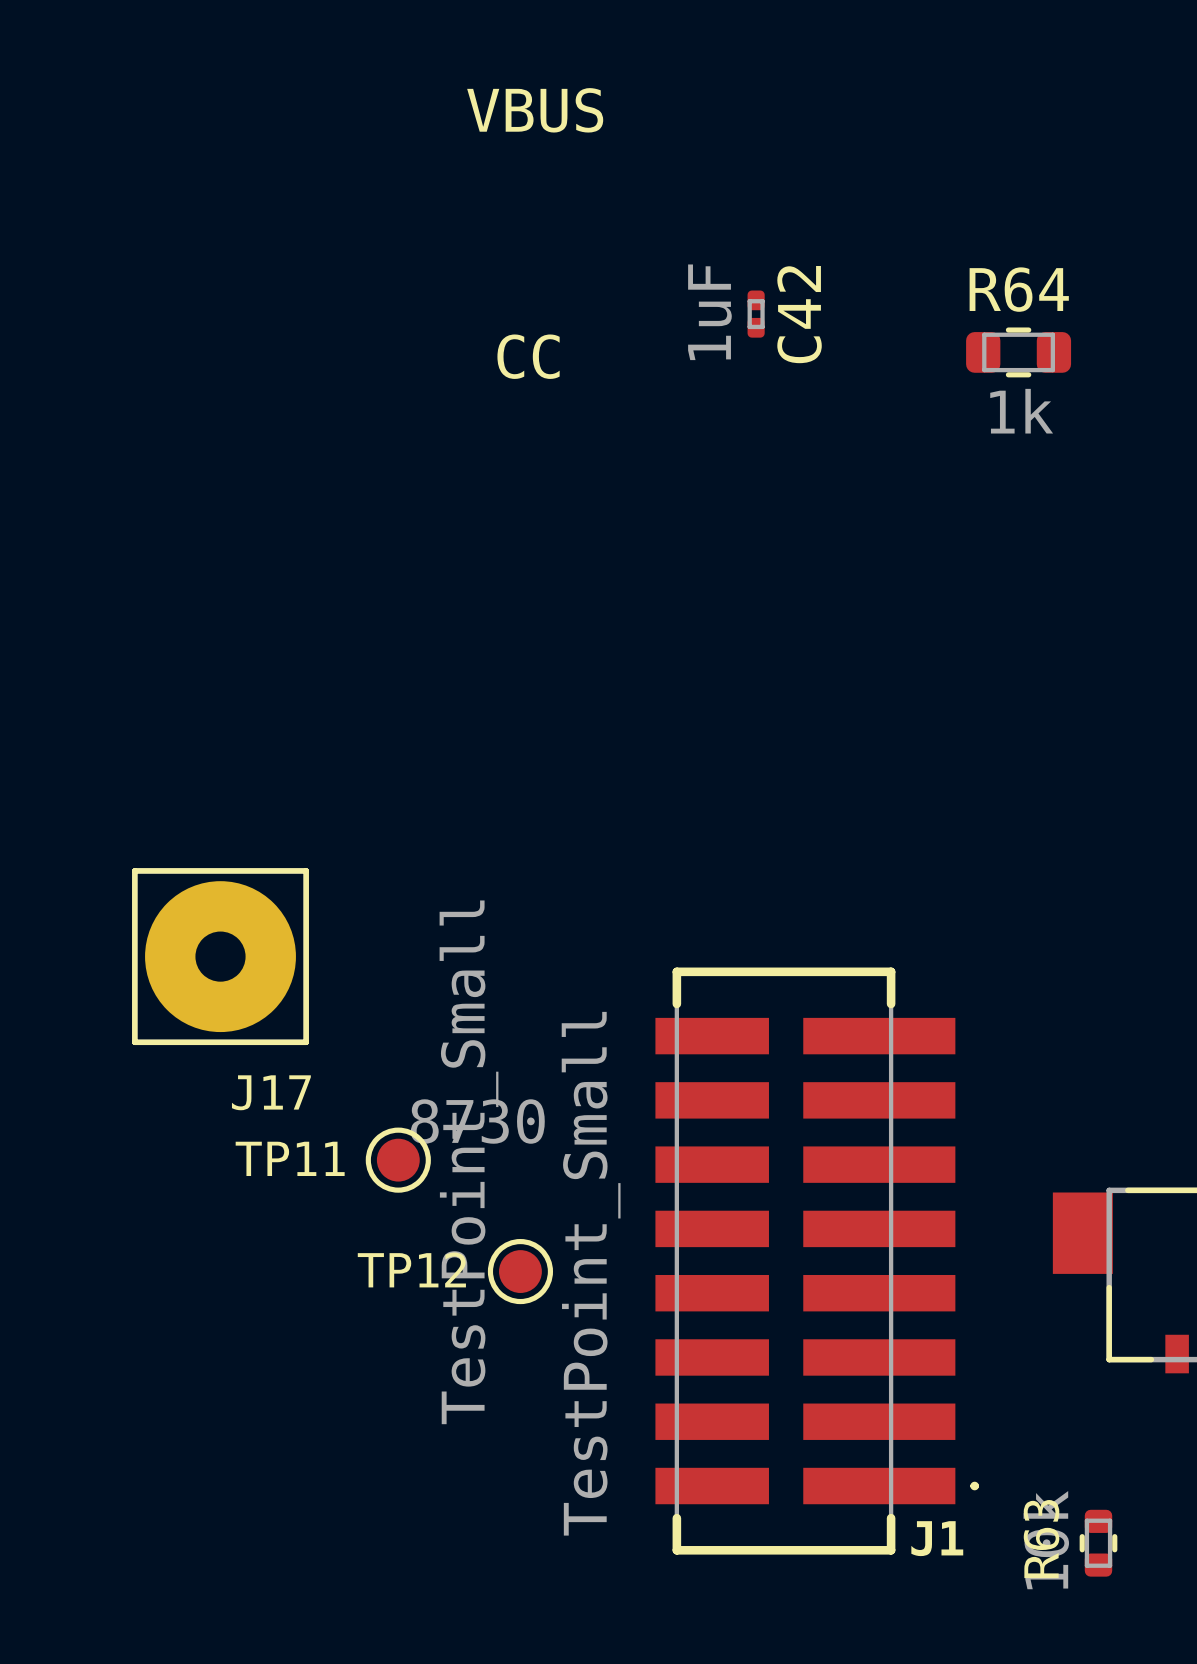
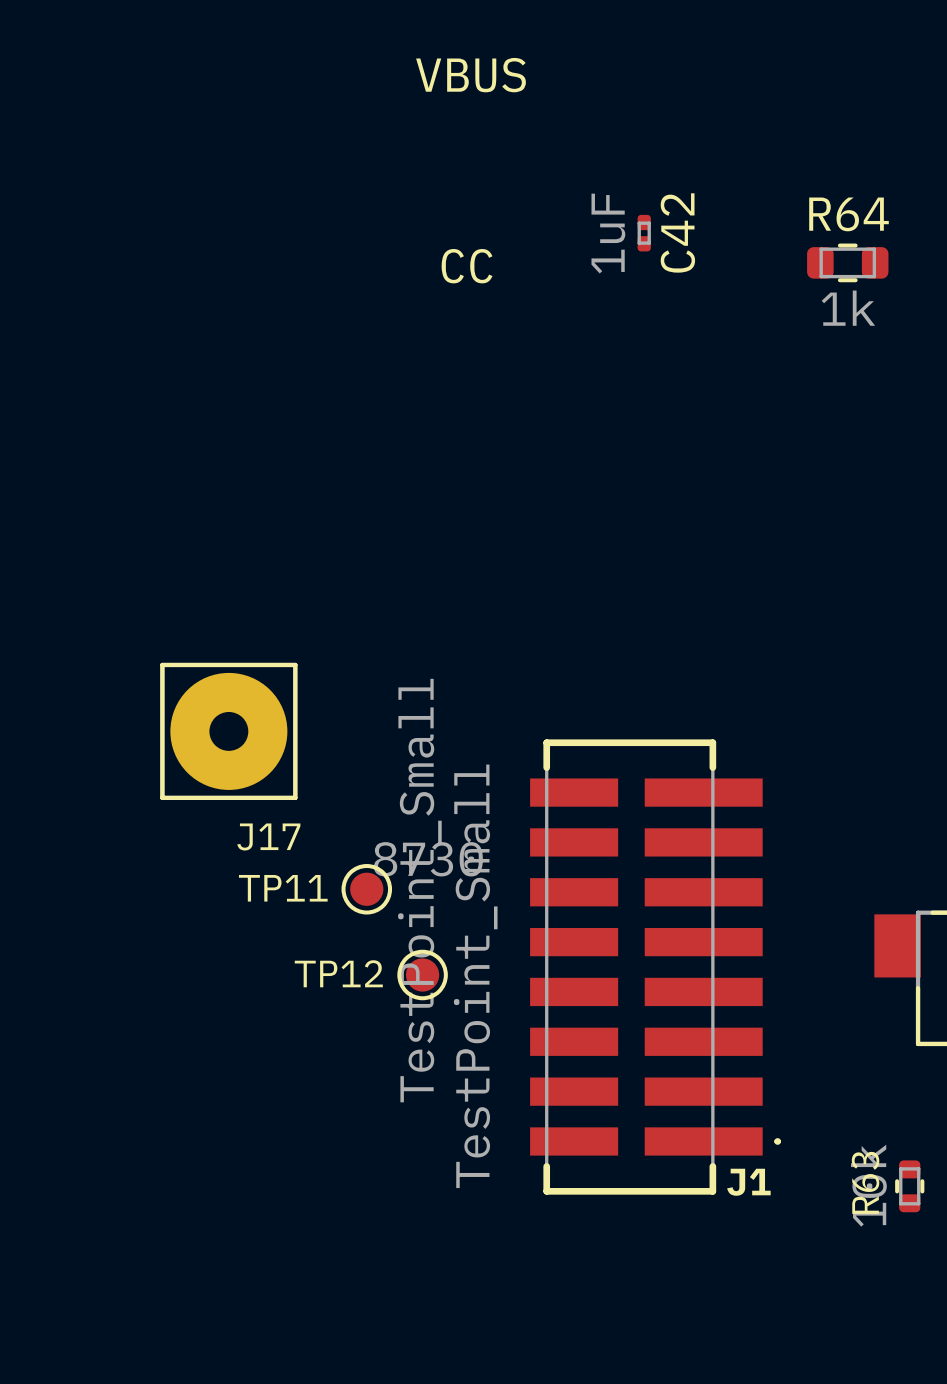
J1 position: (817, 1261) -> (655, 967)
TP12 position: (520, 1271) -> (422, 975)

